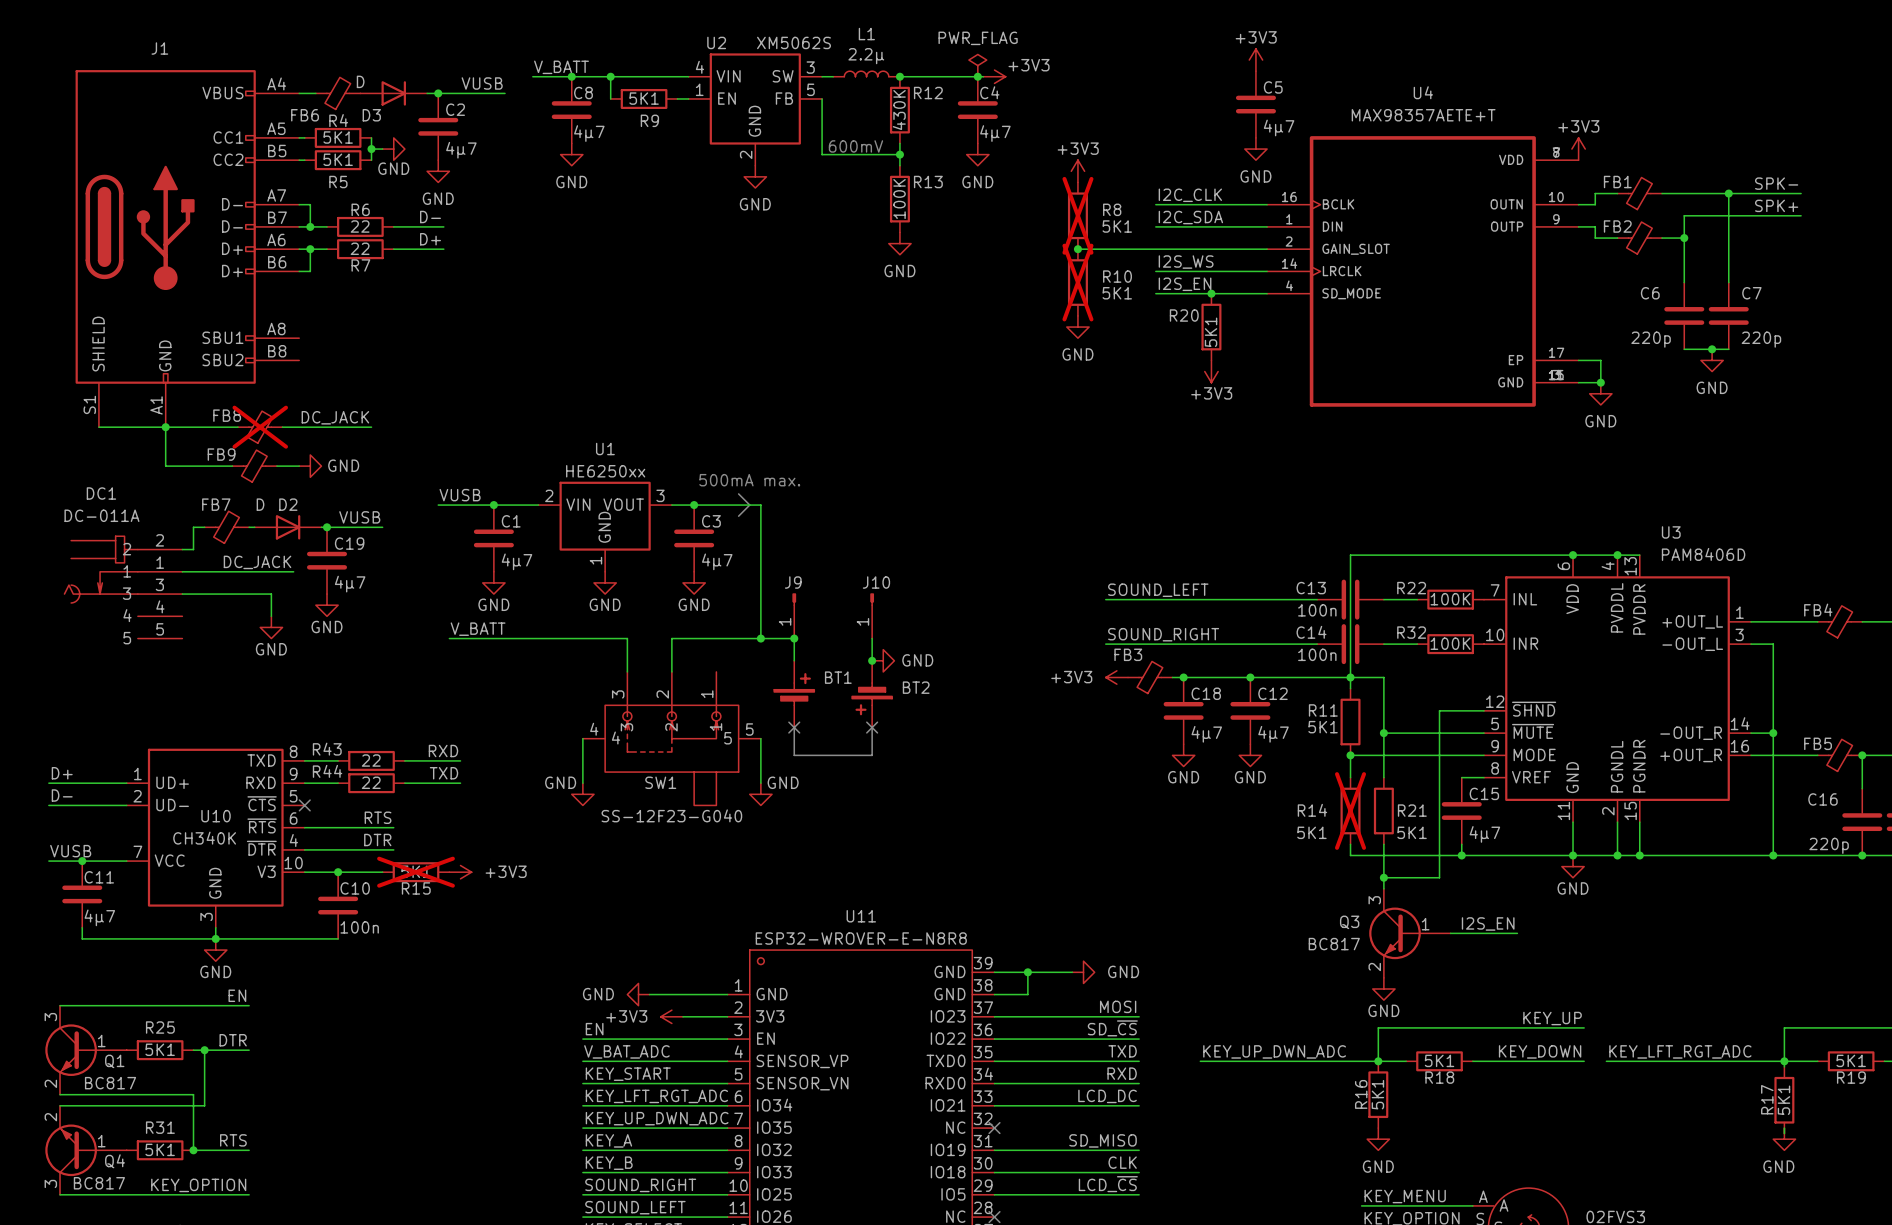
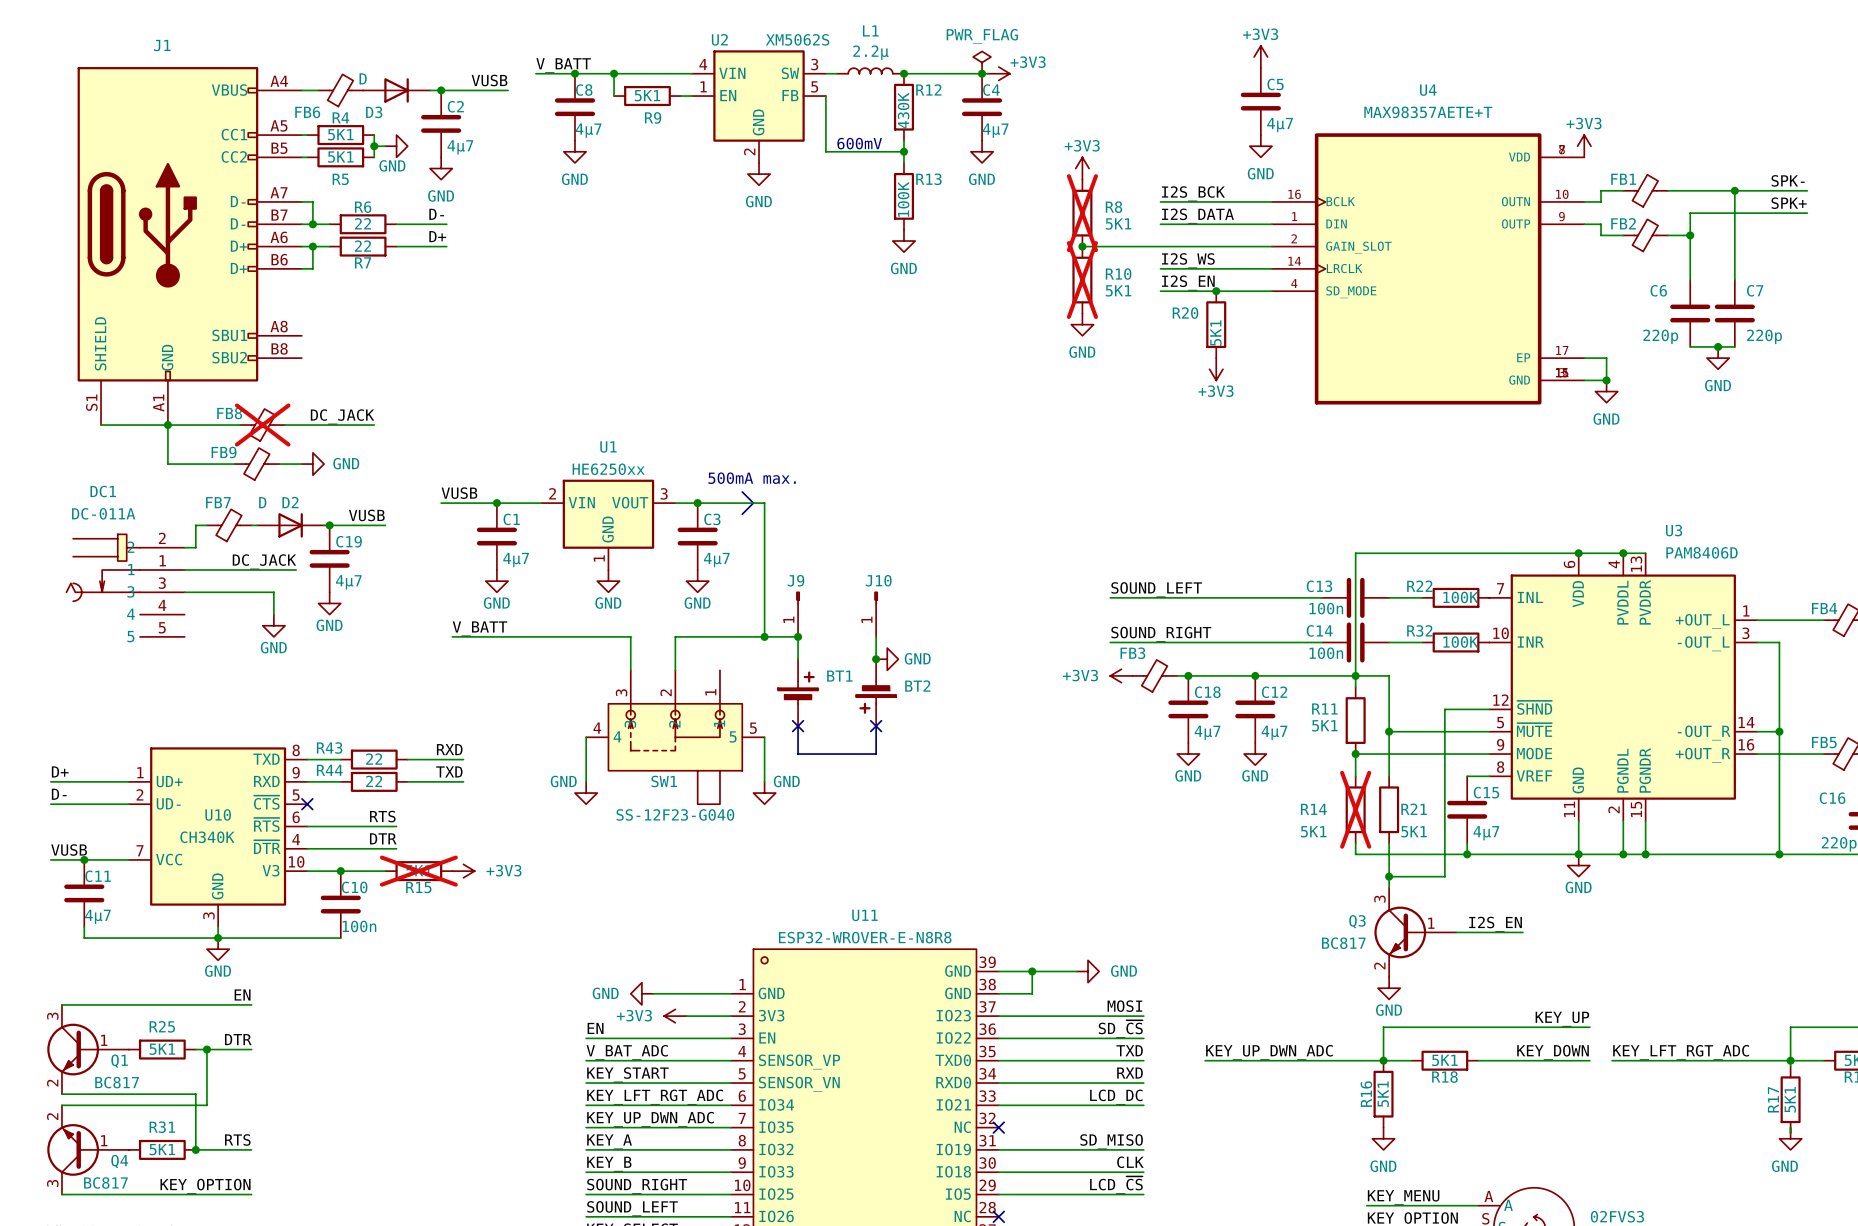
label: I2C_CLK (1190, 195) -> I2S_BCK (1193, 193)
label: I2C_SDA (1190, 217) -> I2S_DATA (1197, 216)

